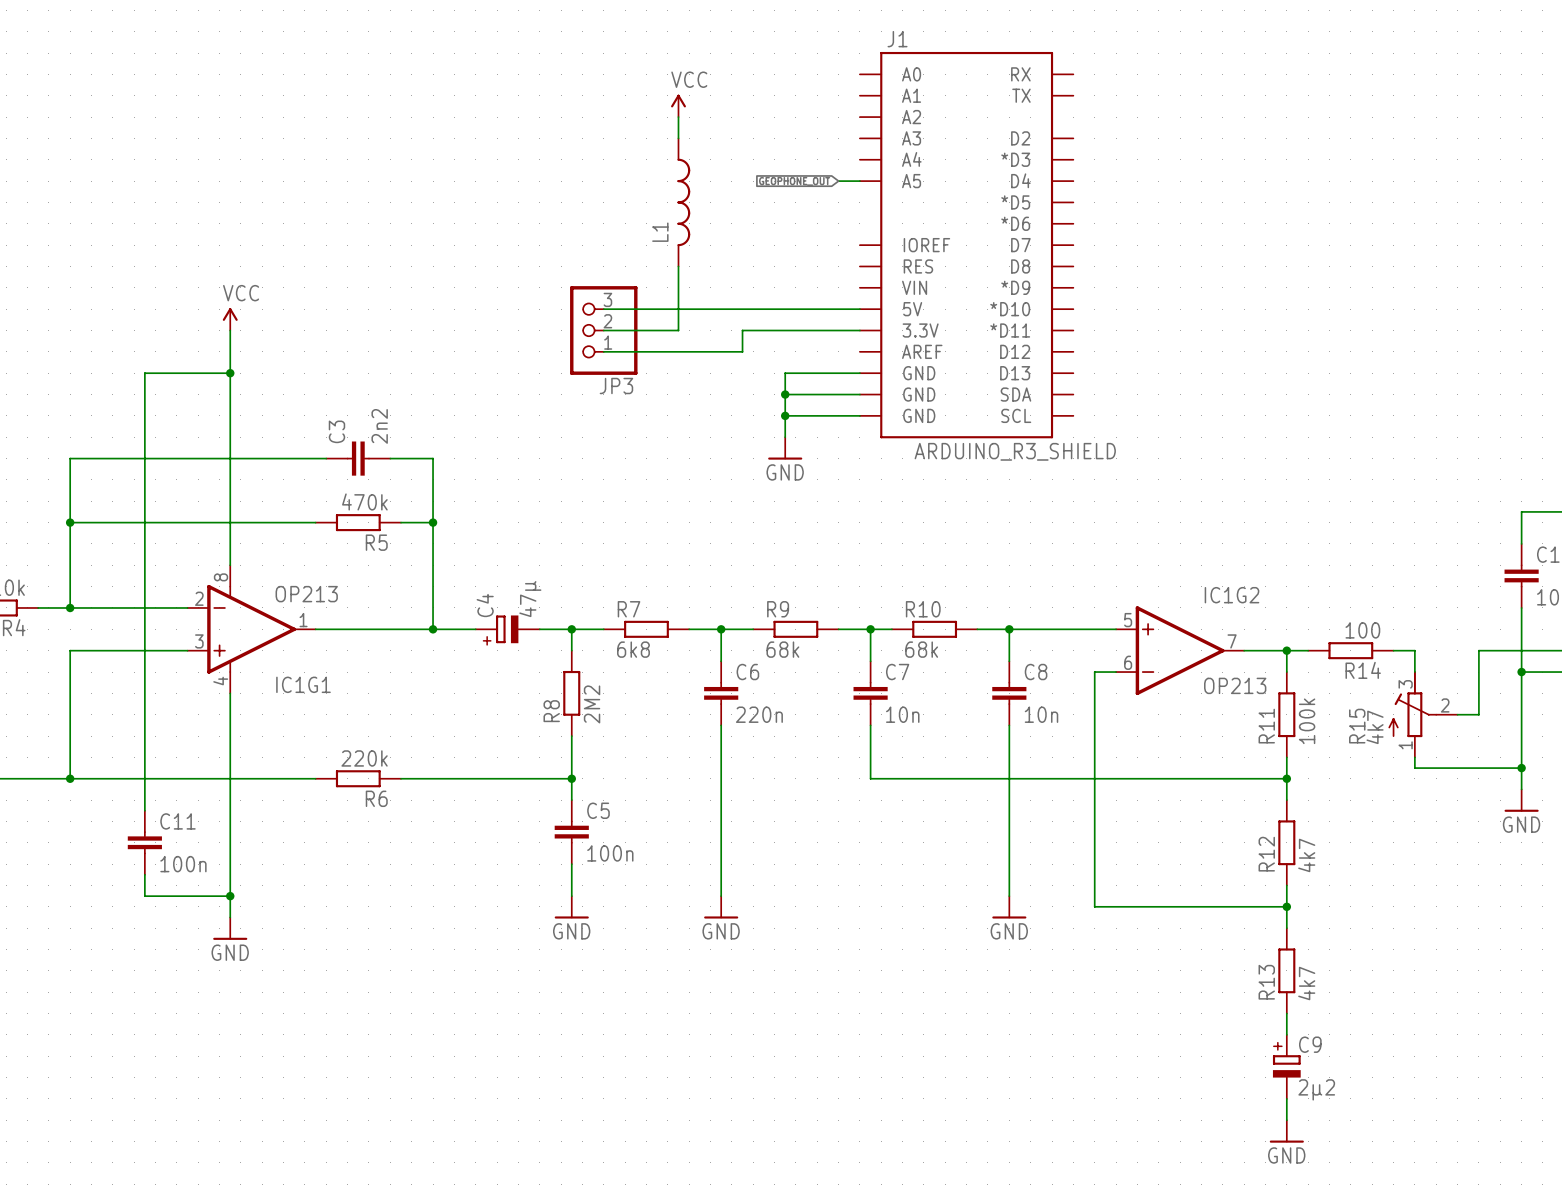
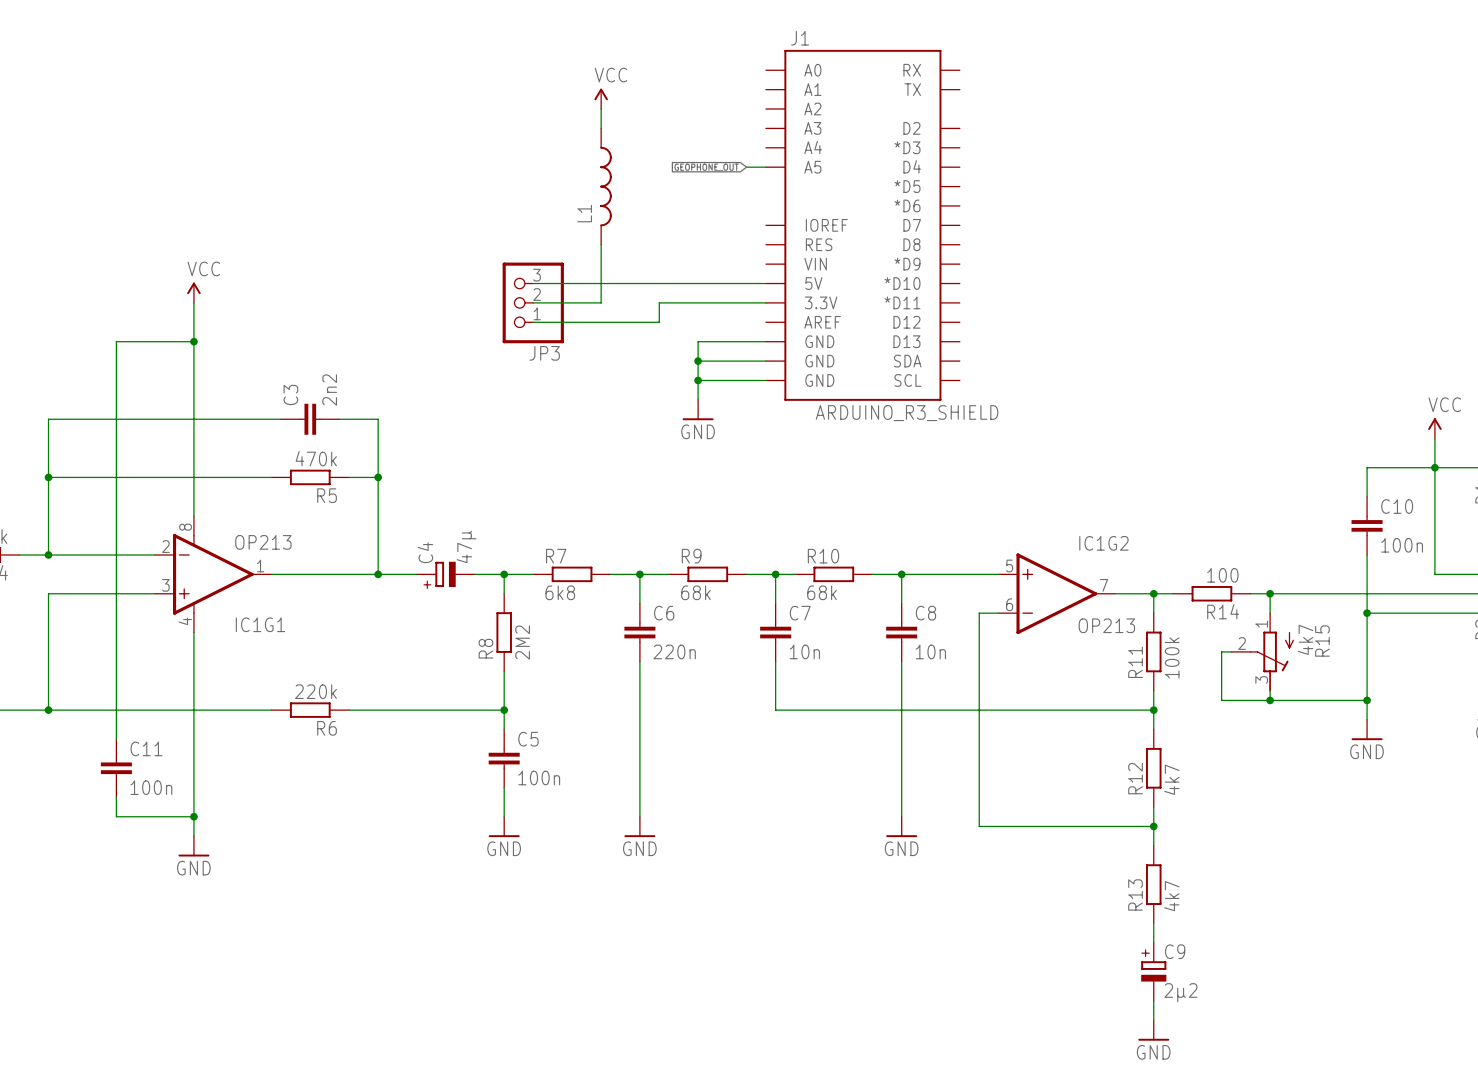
junction: none -> (1270, 593)
wire: (1478, 650) (1478, 714) (1457, 714) -> (1328, 593) (1270, 593)
R15 rotation: 0° (1412, 704) -> 180° (1272, 661)
wire: none -> (1231, 651) (1221, 651) (1221, 700) (1270, 700)
junction: none -> (1270, 700)

